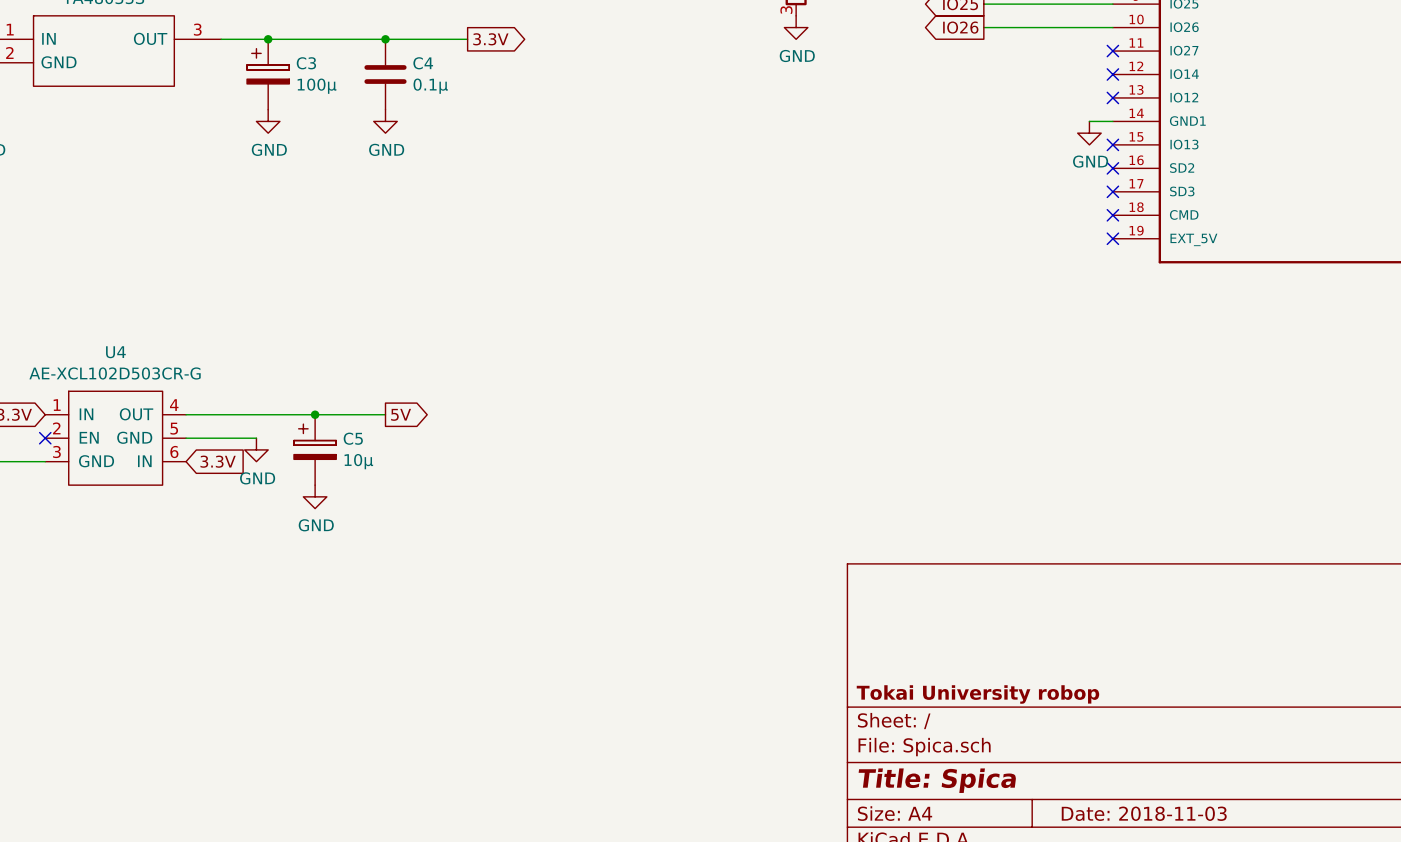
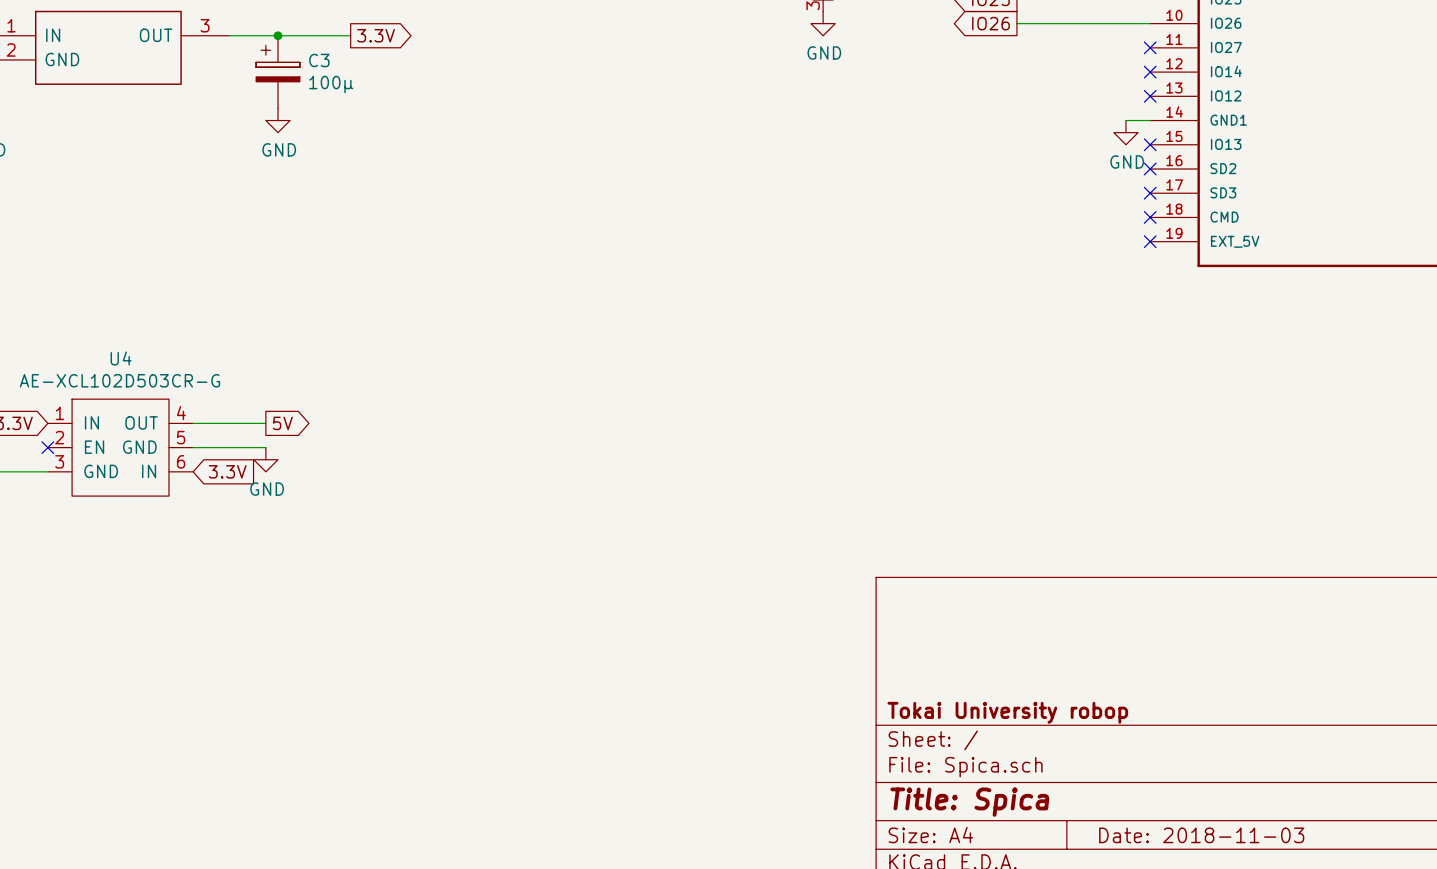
wire: (338, 39) (467, 39) -> none
junction: (385, 39) -> none
global label position: 3.3V (490, 39) -> 3.3V (376, 35)
C4: 0.1μ (385, 74) -> none
power symbol: GND (385, 121) -> none
wire: (256, 414) (385, 414) -> none
junction: (315, 414) -> none
global label position: 5V (401, 414) -> 5V (282, 423)
C5: 10μ (315, 449) -> none
power symbol: GND (315, 496) -> none

